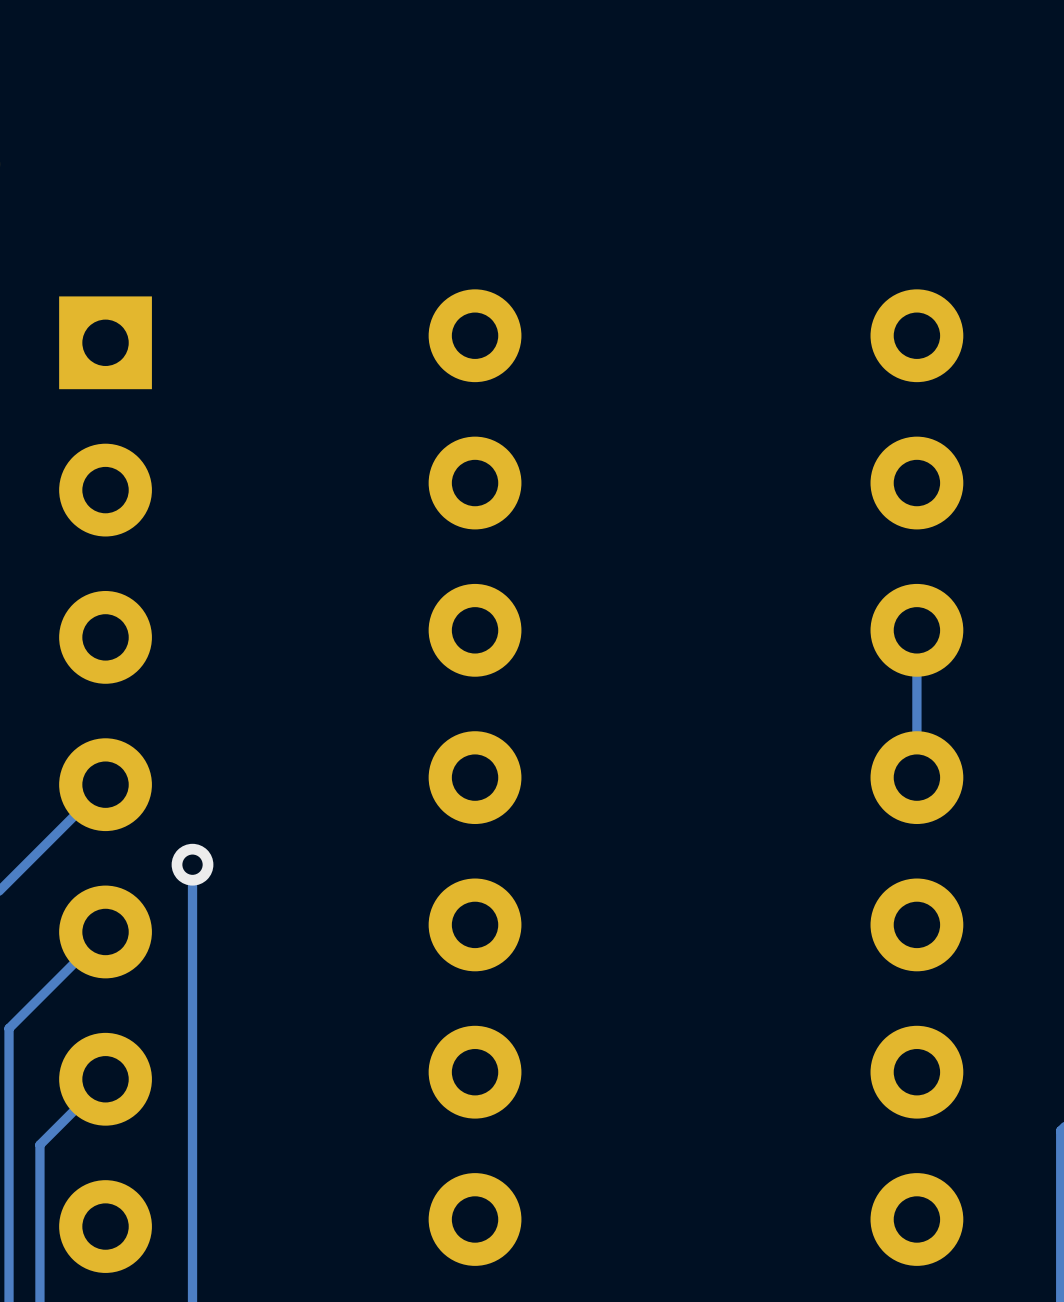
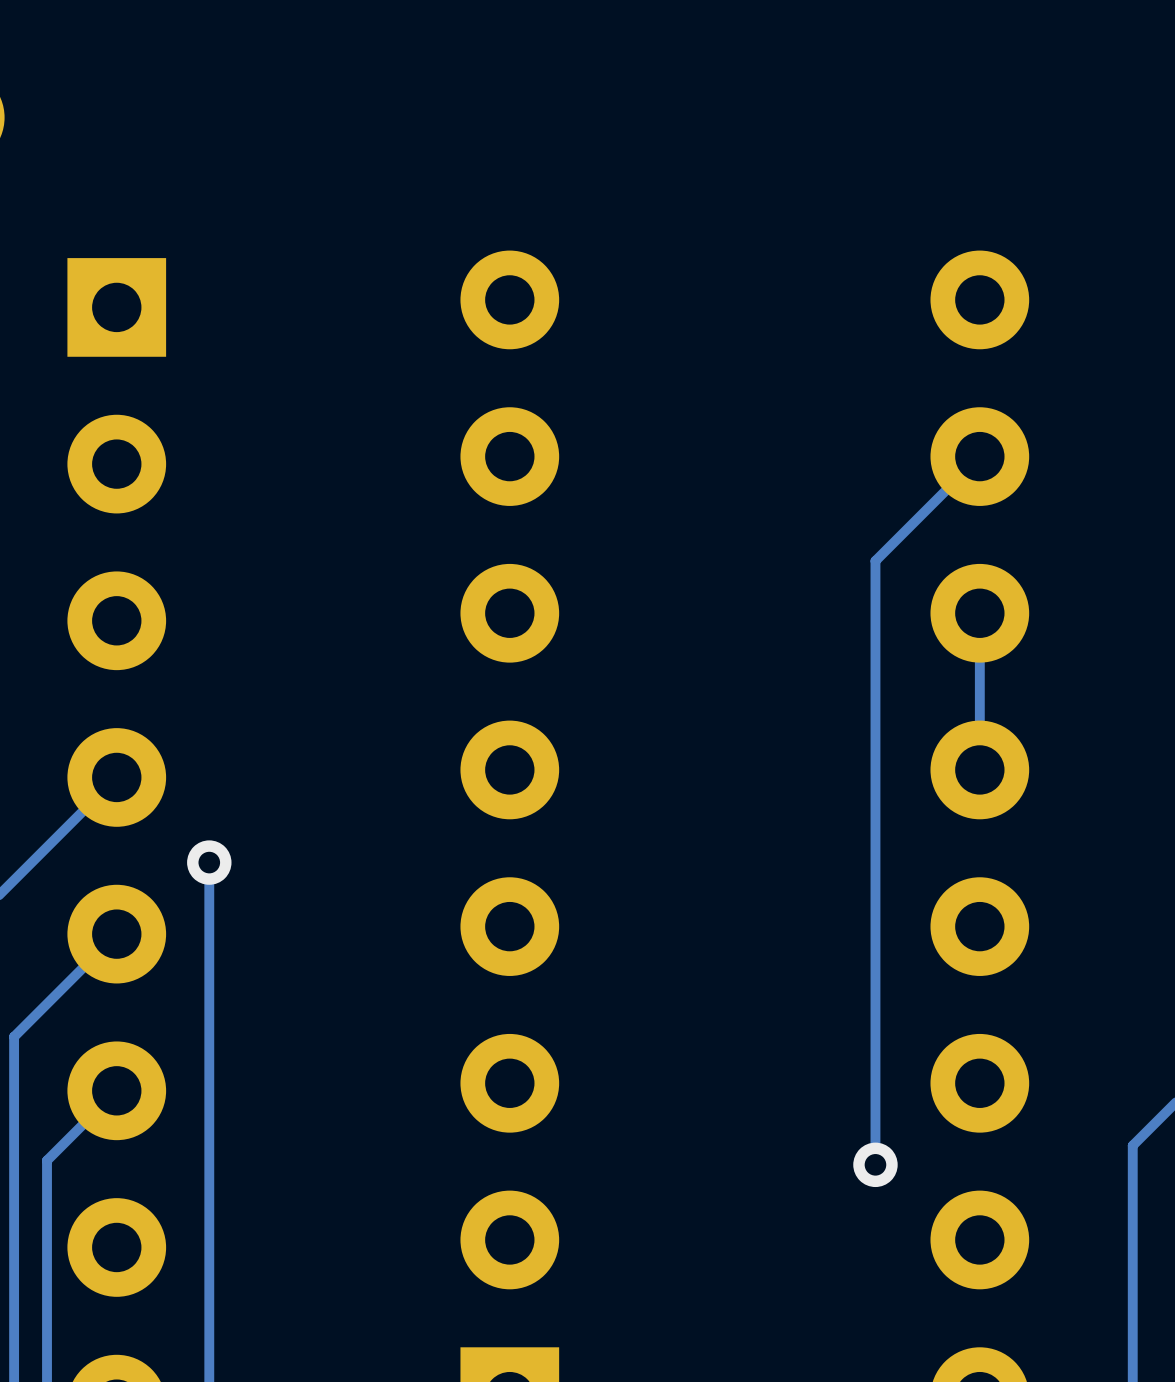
track: none -> (979, 456) (875, 560) (875, 1164)
via: none -> (875, 1164)

